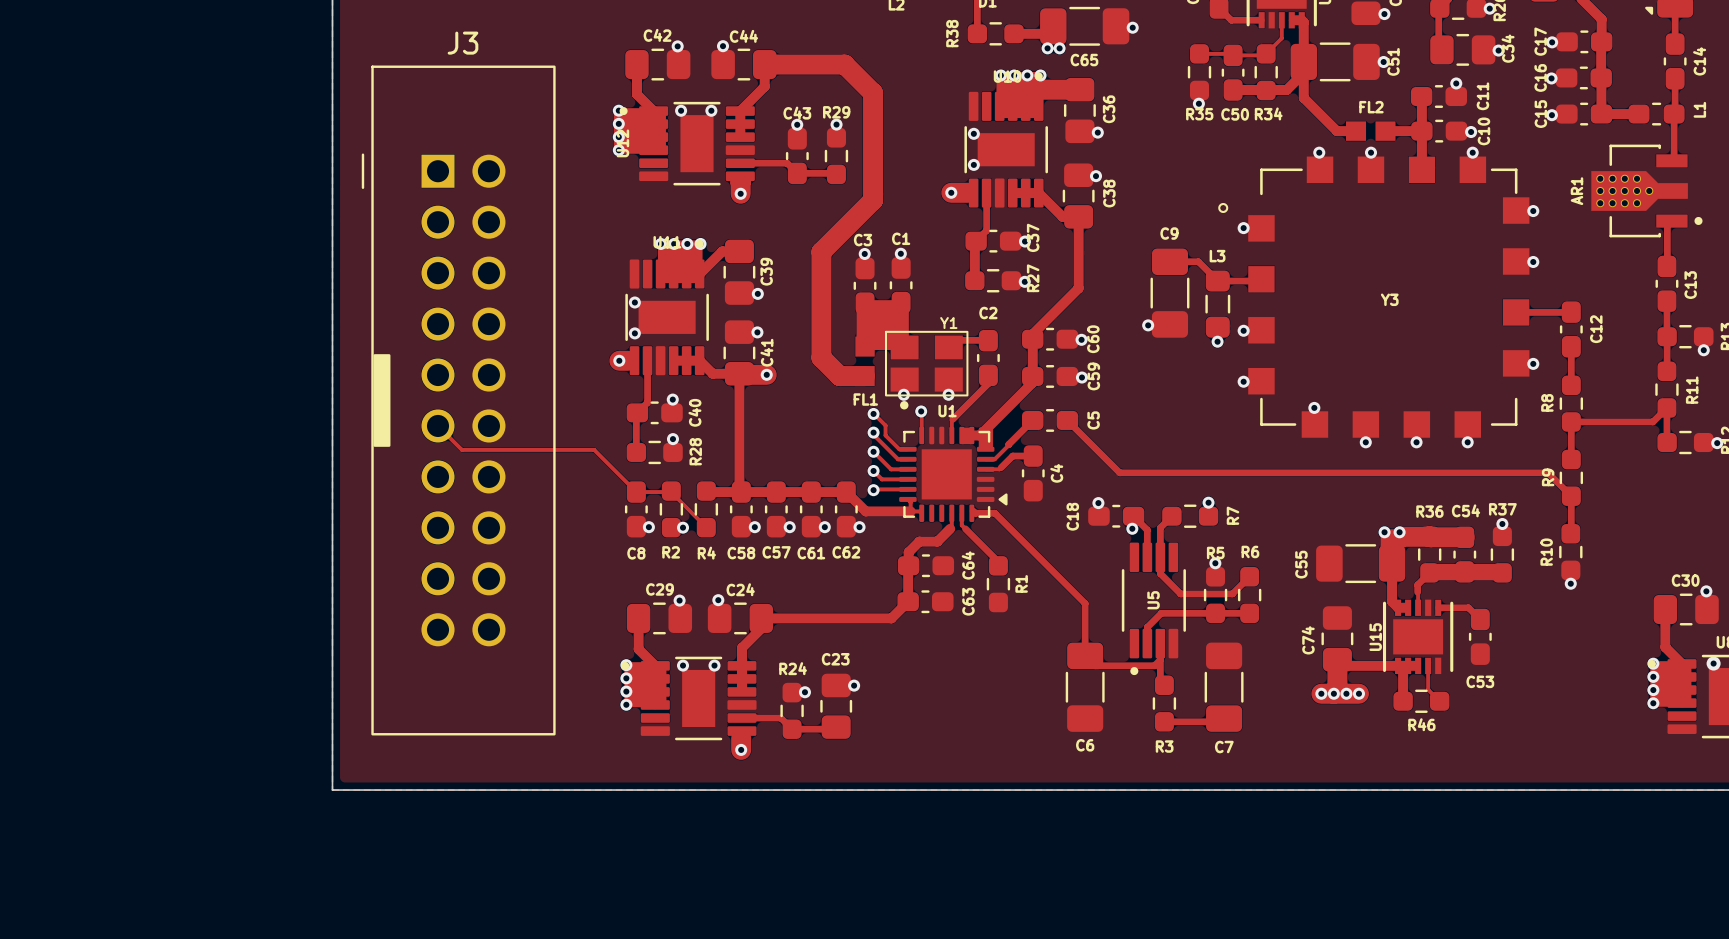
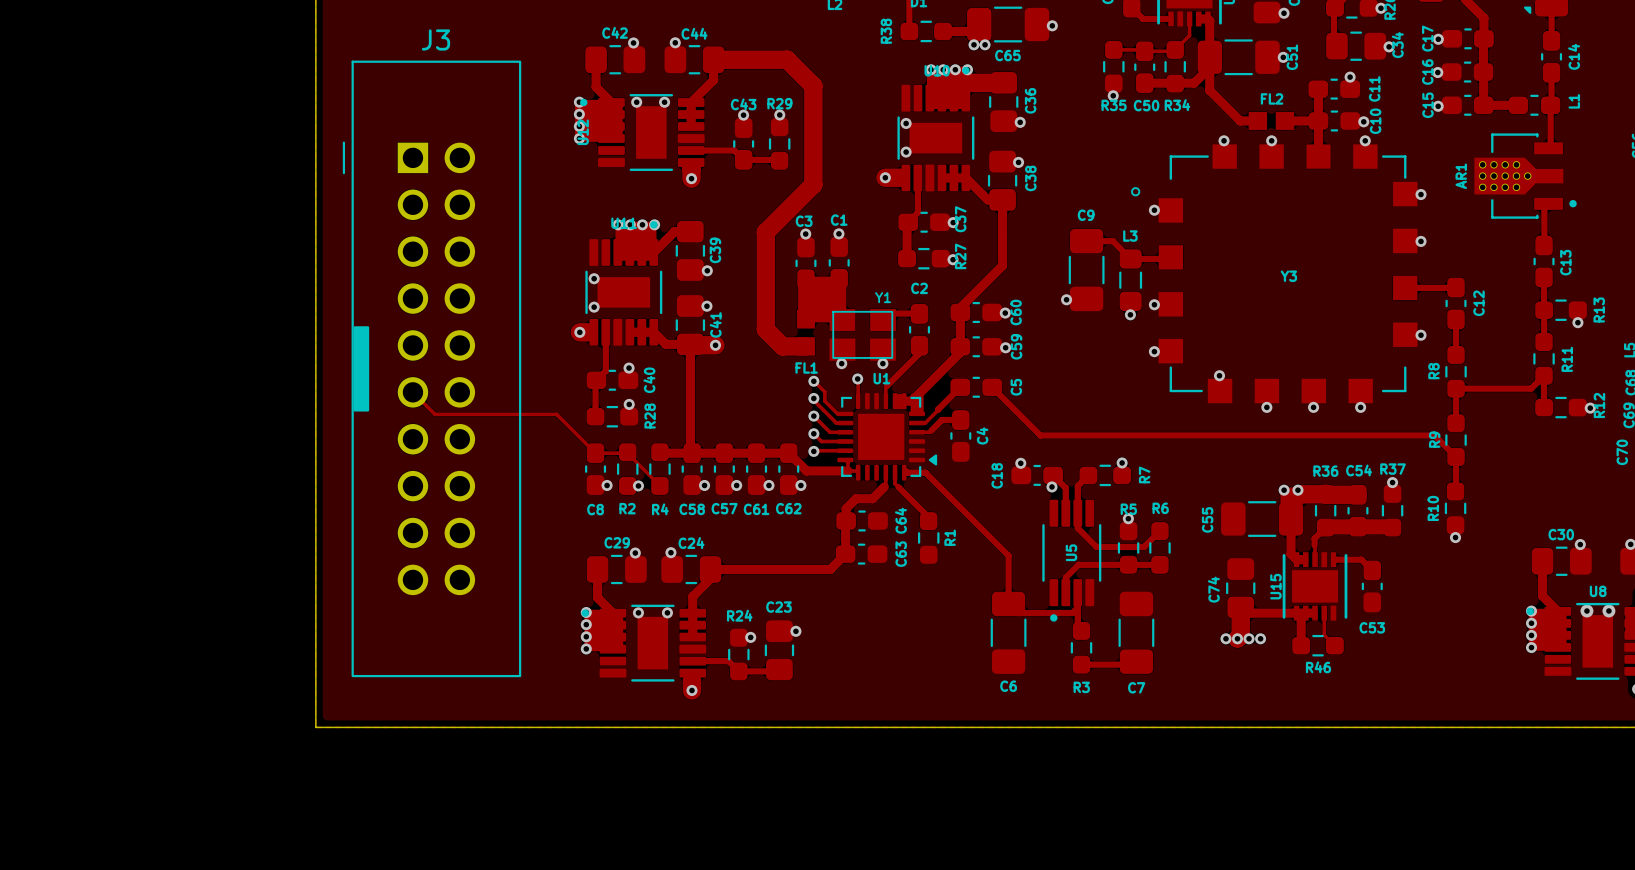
Y1 footprint: [884, 330, 969, 410] -> [829, 309, 896, 361]
track: (1321, 693) (1358, 693) -> none

